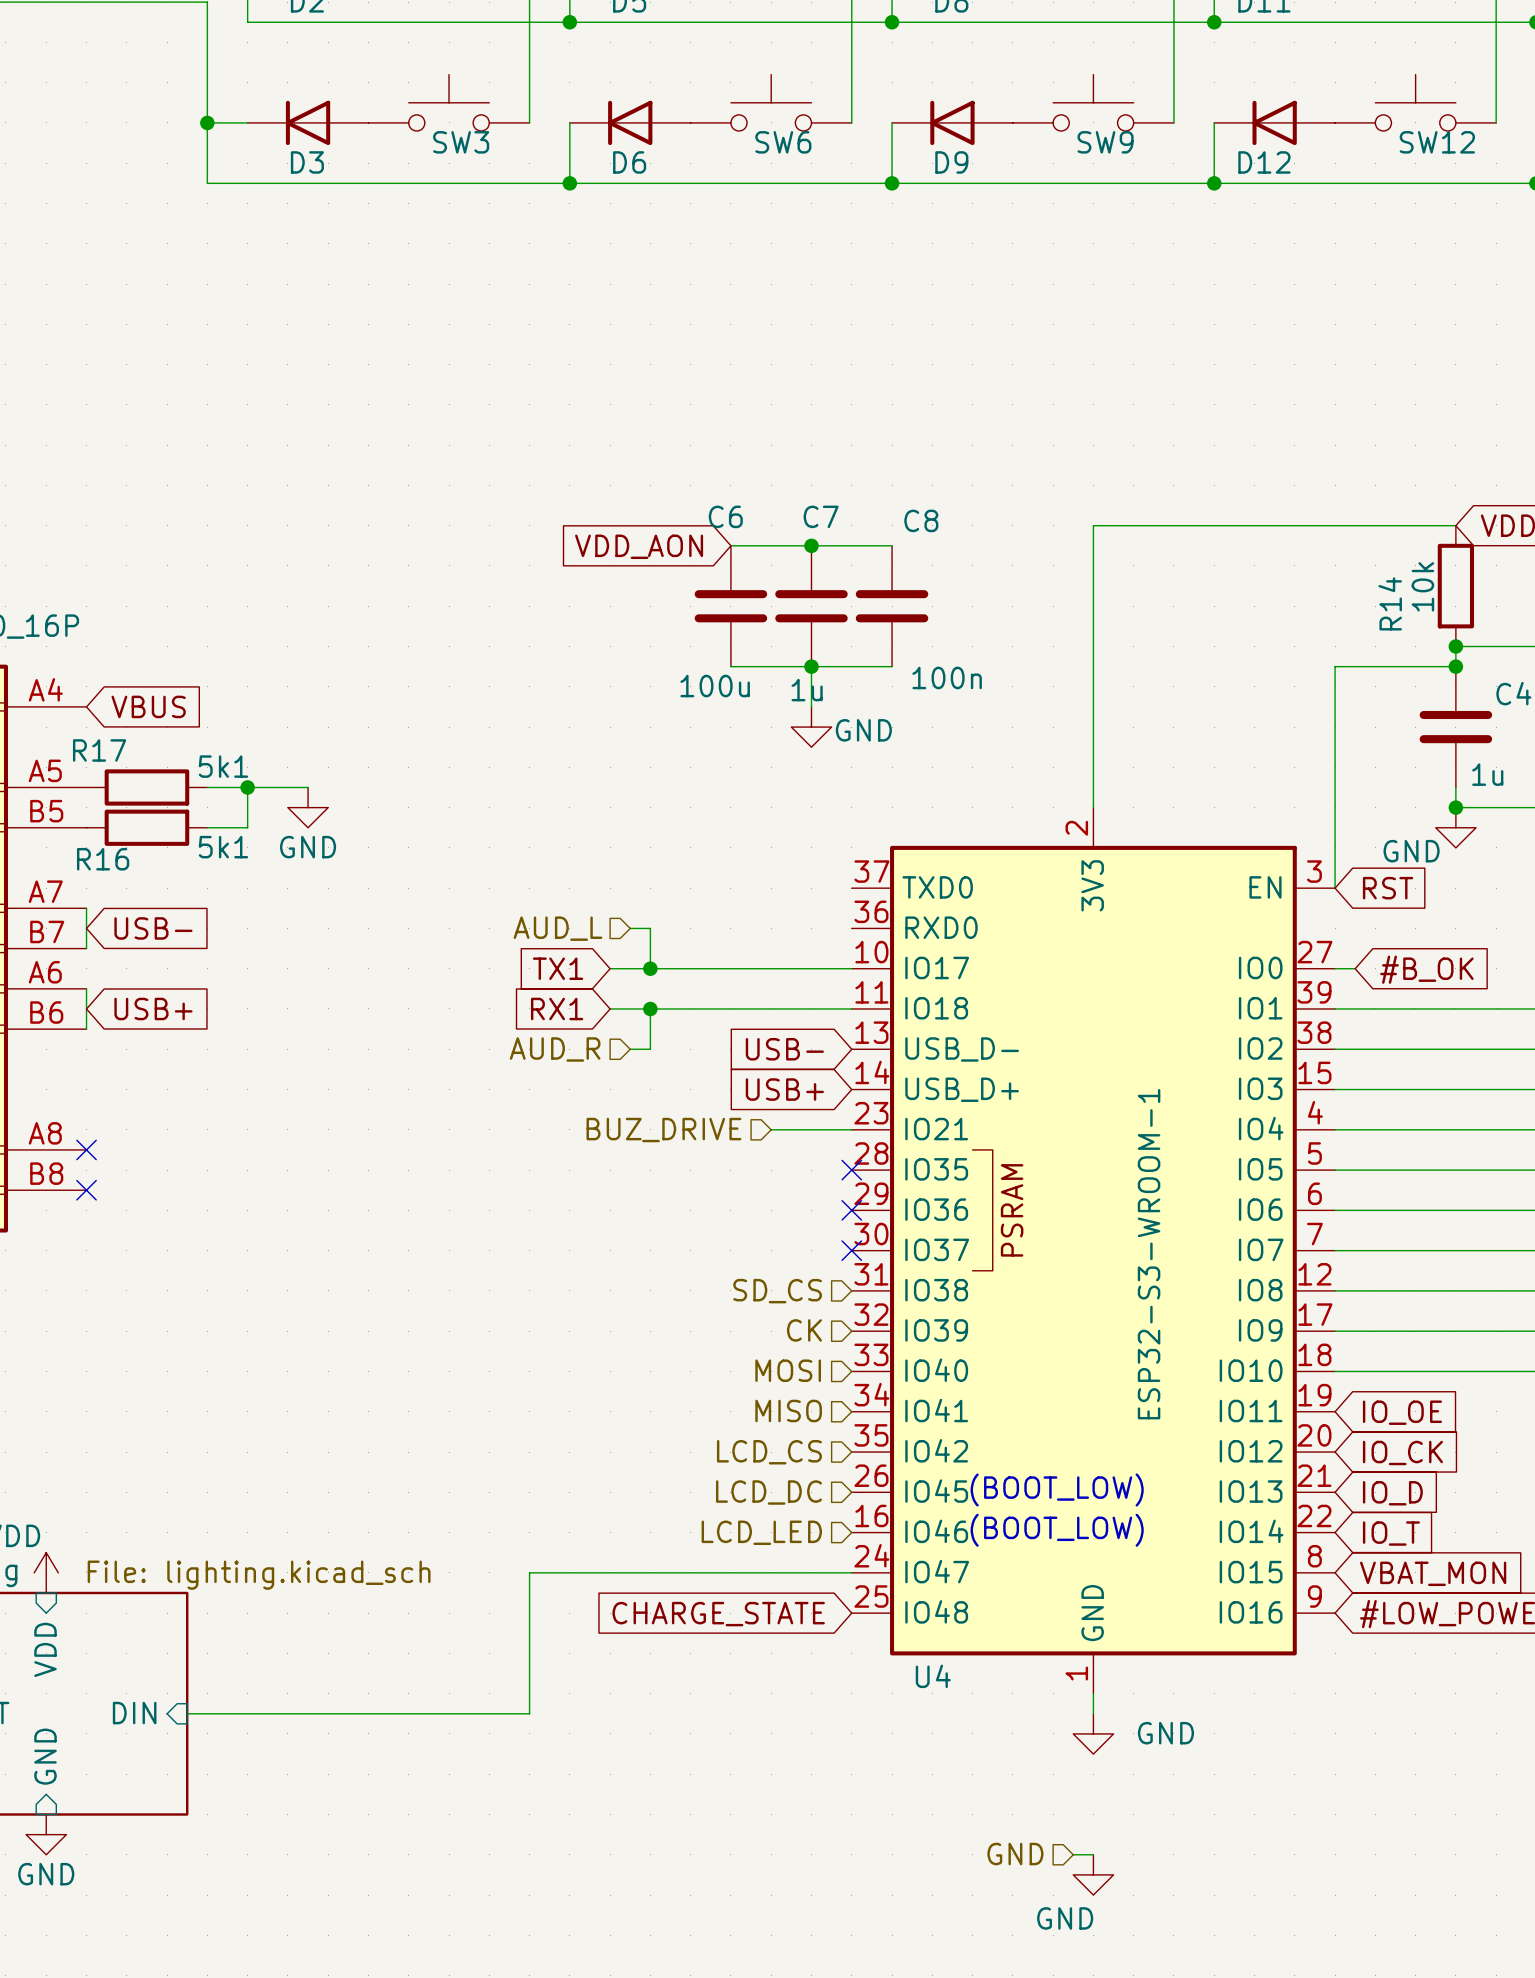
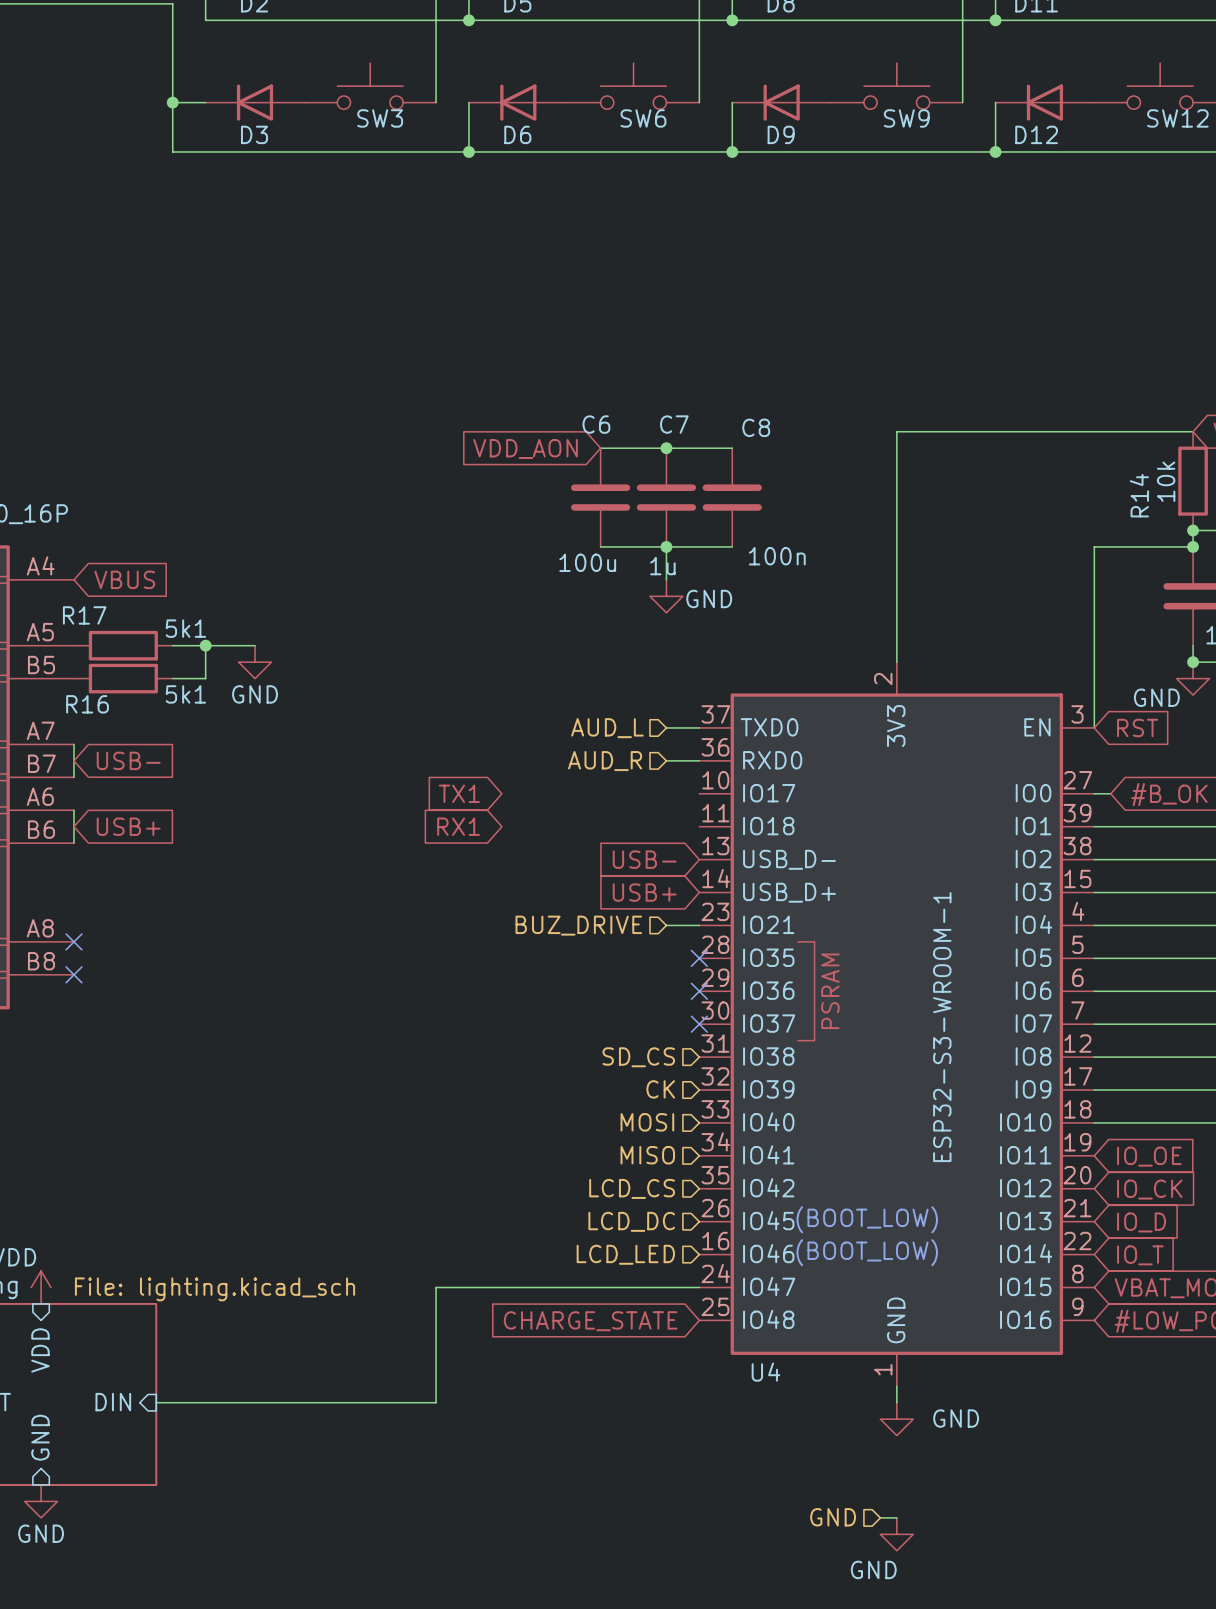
wire: none -> (666, 727) (699, 727)
hierarchical label position: AUD_L (558, 928) -> AUD_L (607, 728)
wire: (630, 928) (650, 928) (650, 968) -> none
wire: (610, 968) (851, 968) -> none
junction: (650, 968) -> none
wire: (610, 1008) (851, 1008) -> none
wire: (650, 1008) (650, 1049) (630, 1049) -> none
junction: (650, 1008) -> none
hierarchical label position: AUD_R (555, 1049) -> AUD_R (605, 761)
wire: (771, 1129) (811, 1129) -> (666, 760) (699, 760)
hierarchical label position: BUZ_DRIVE (663, 1130) -> BUZ_DRIVE (578, 925)

